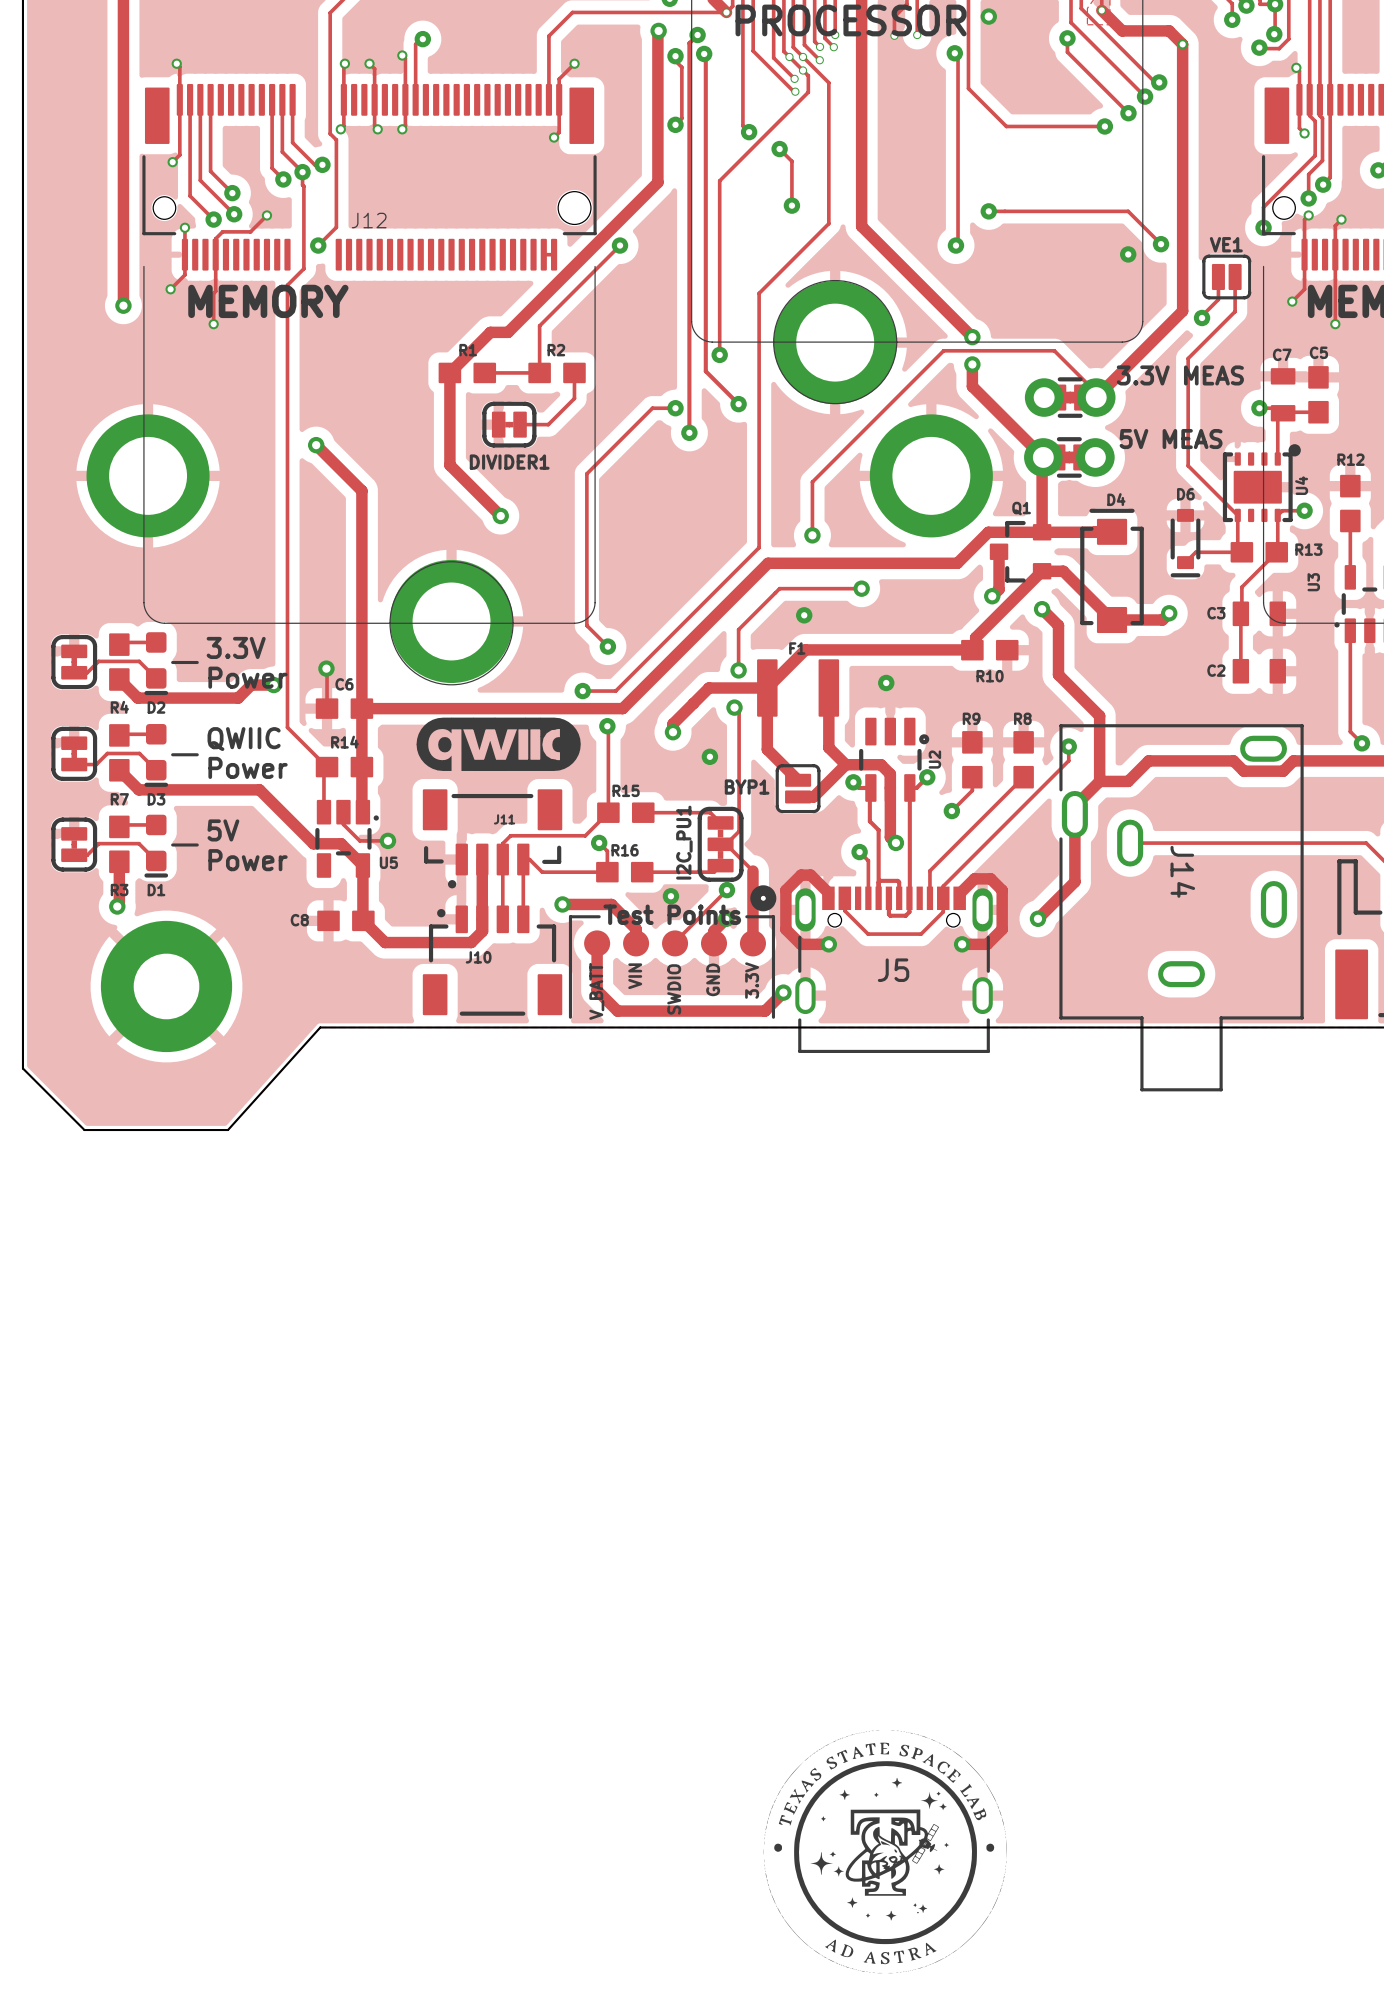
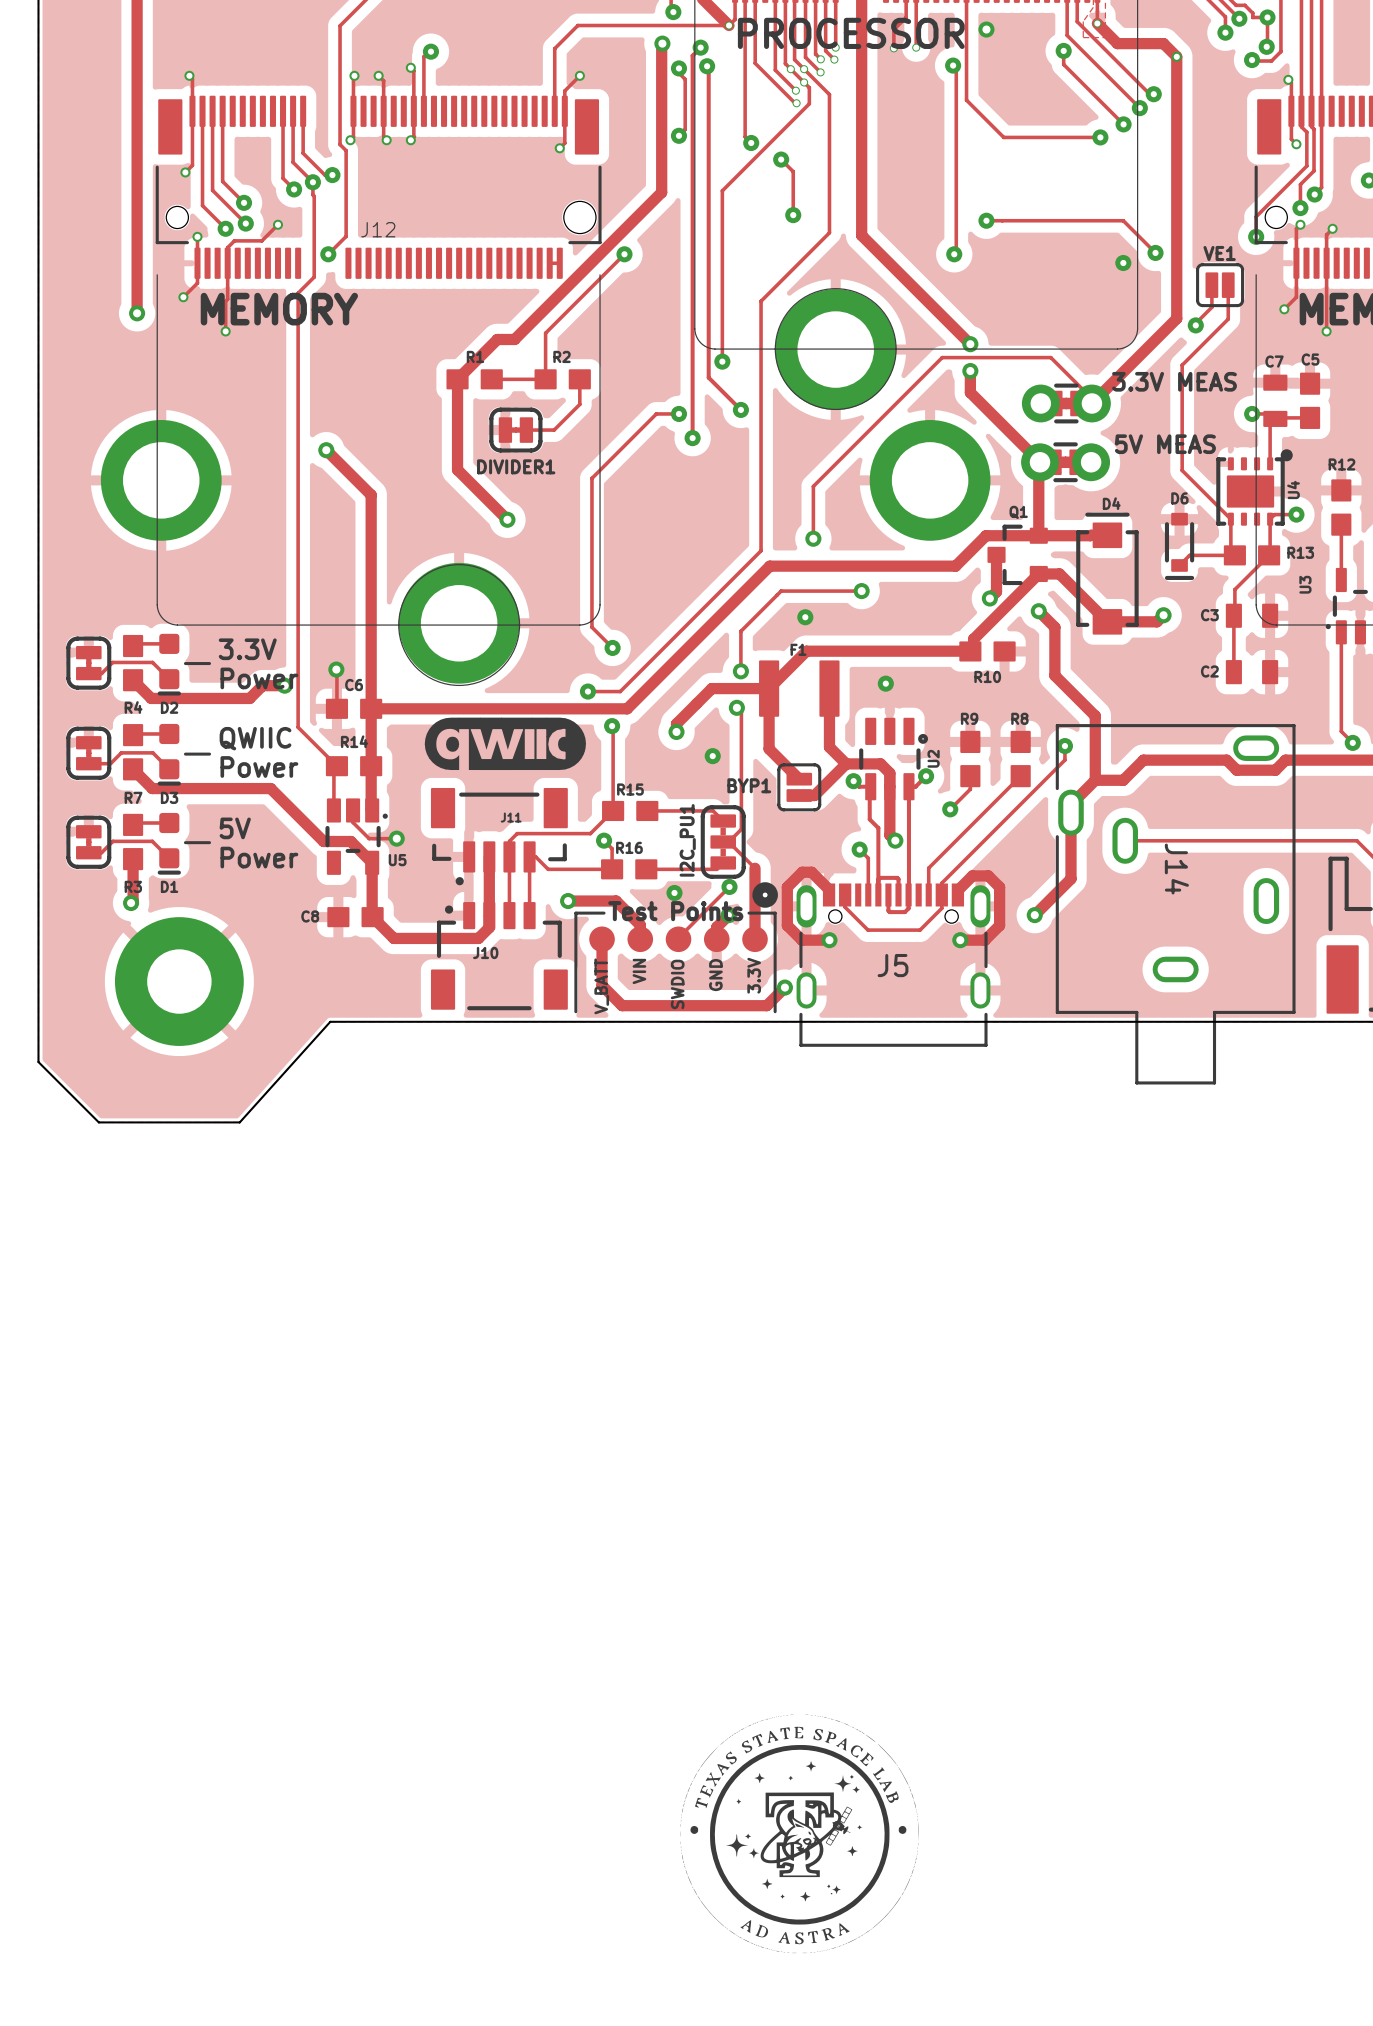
drawing position: (885, 1851) -> (799, 1833)

